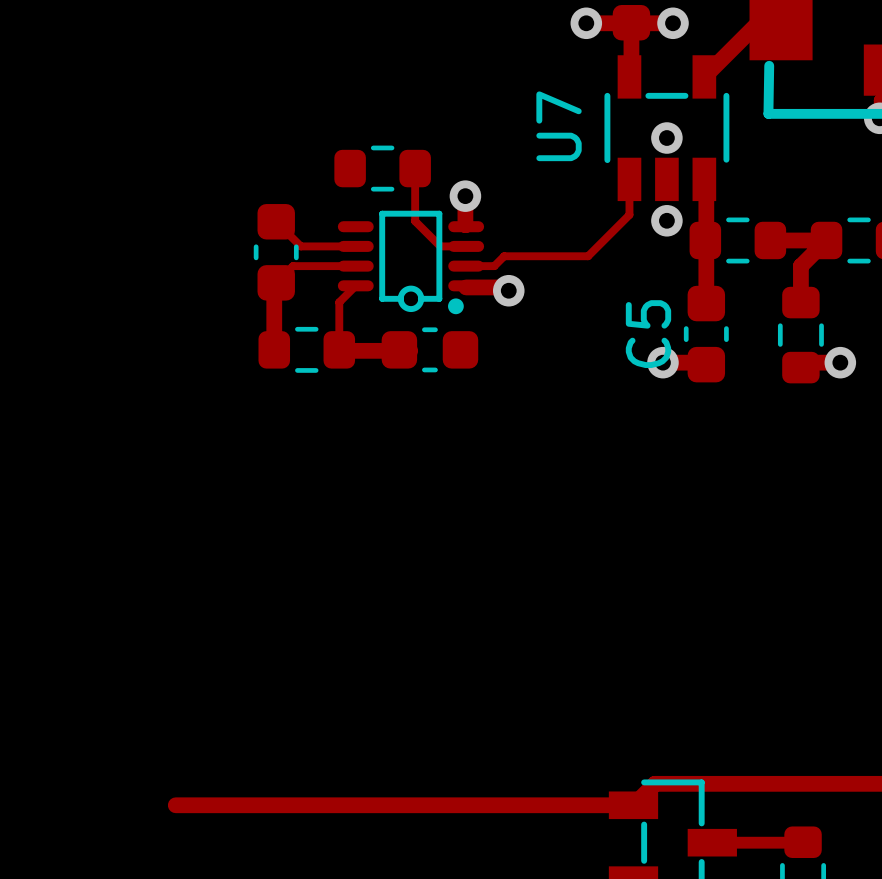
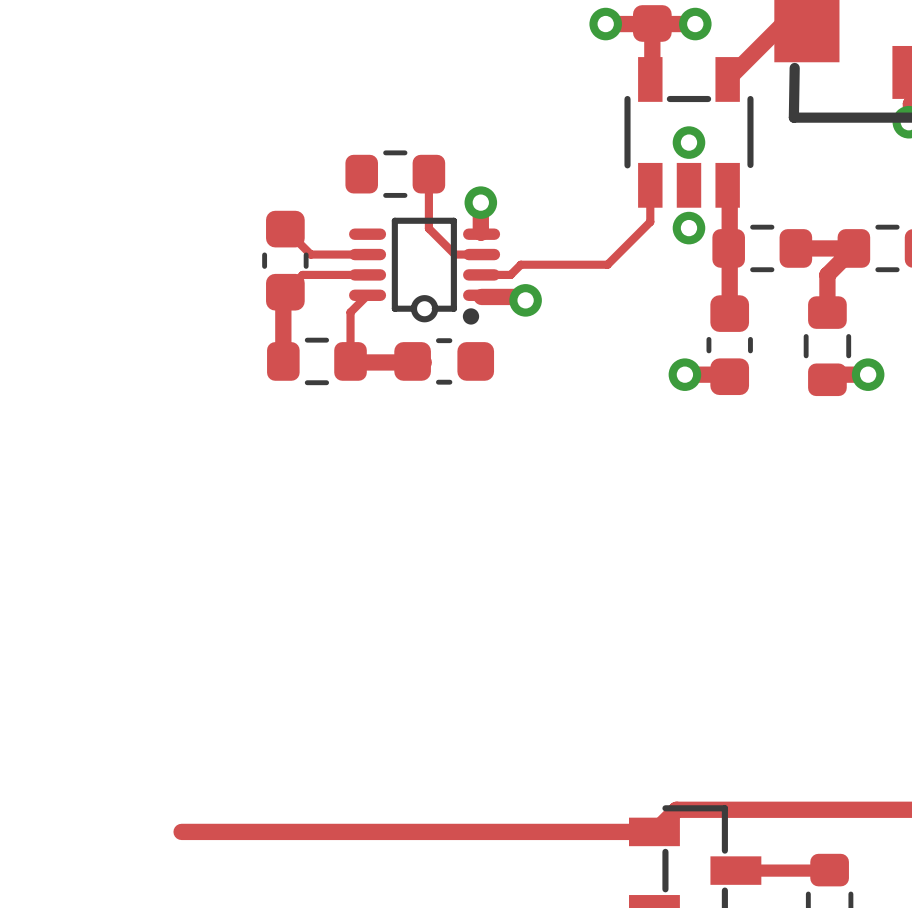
U7 name: U7 (559, 126) -> none
C5 name: C5 (648, 334) -> none

